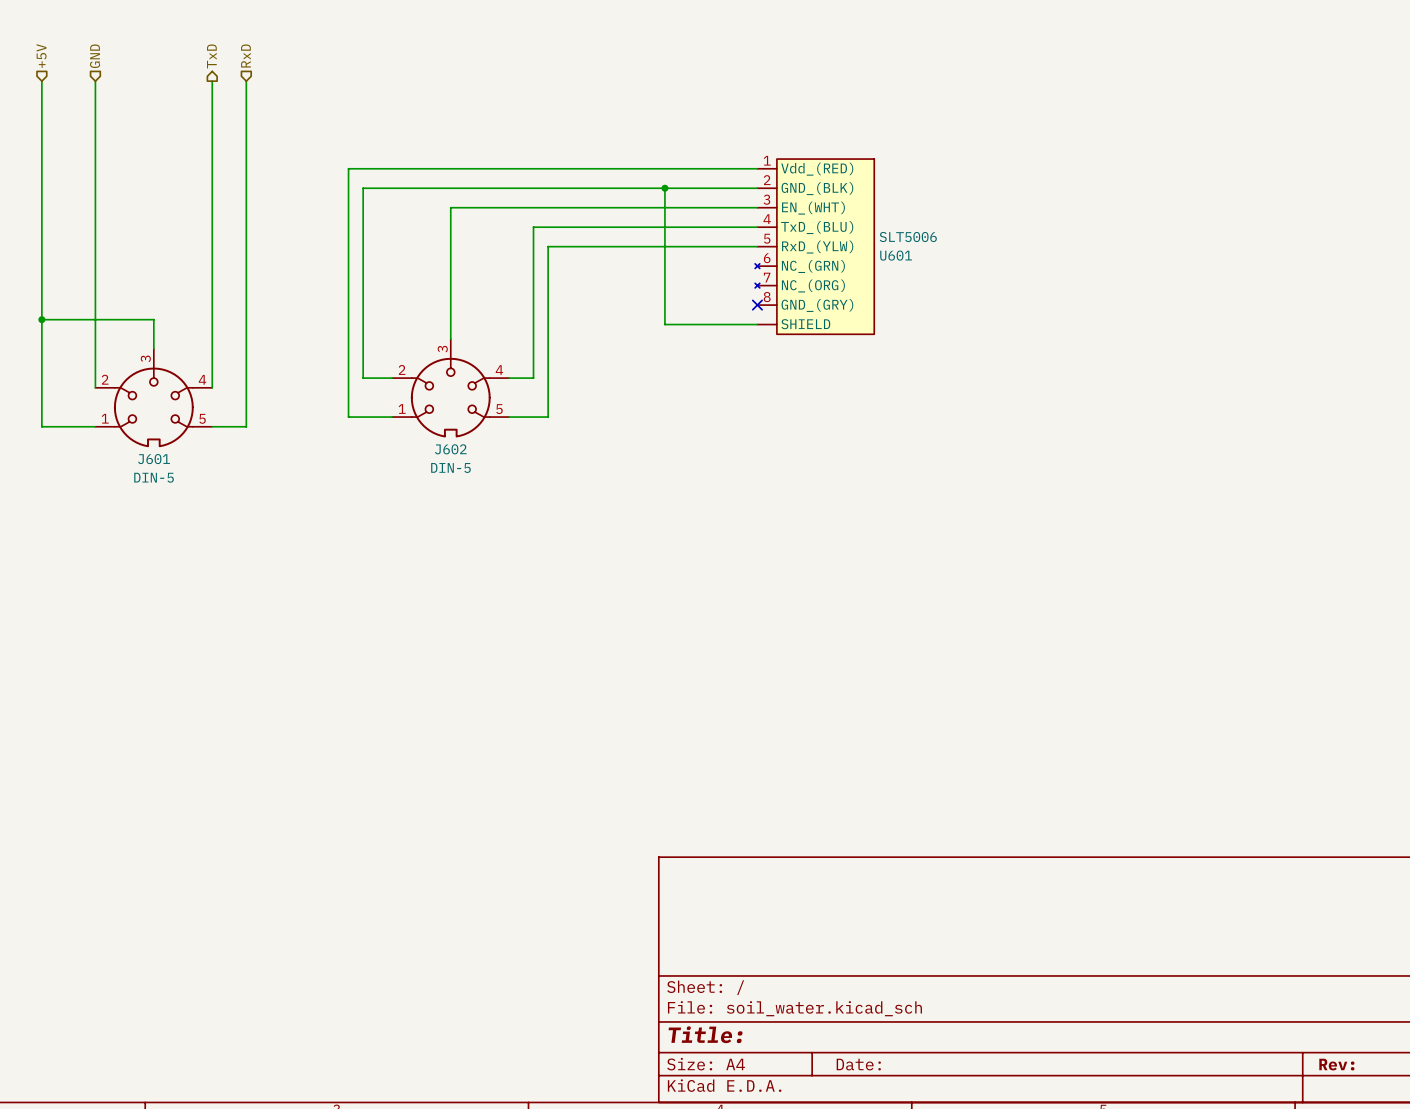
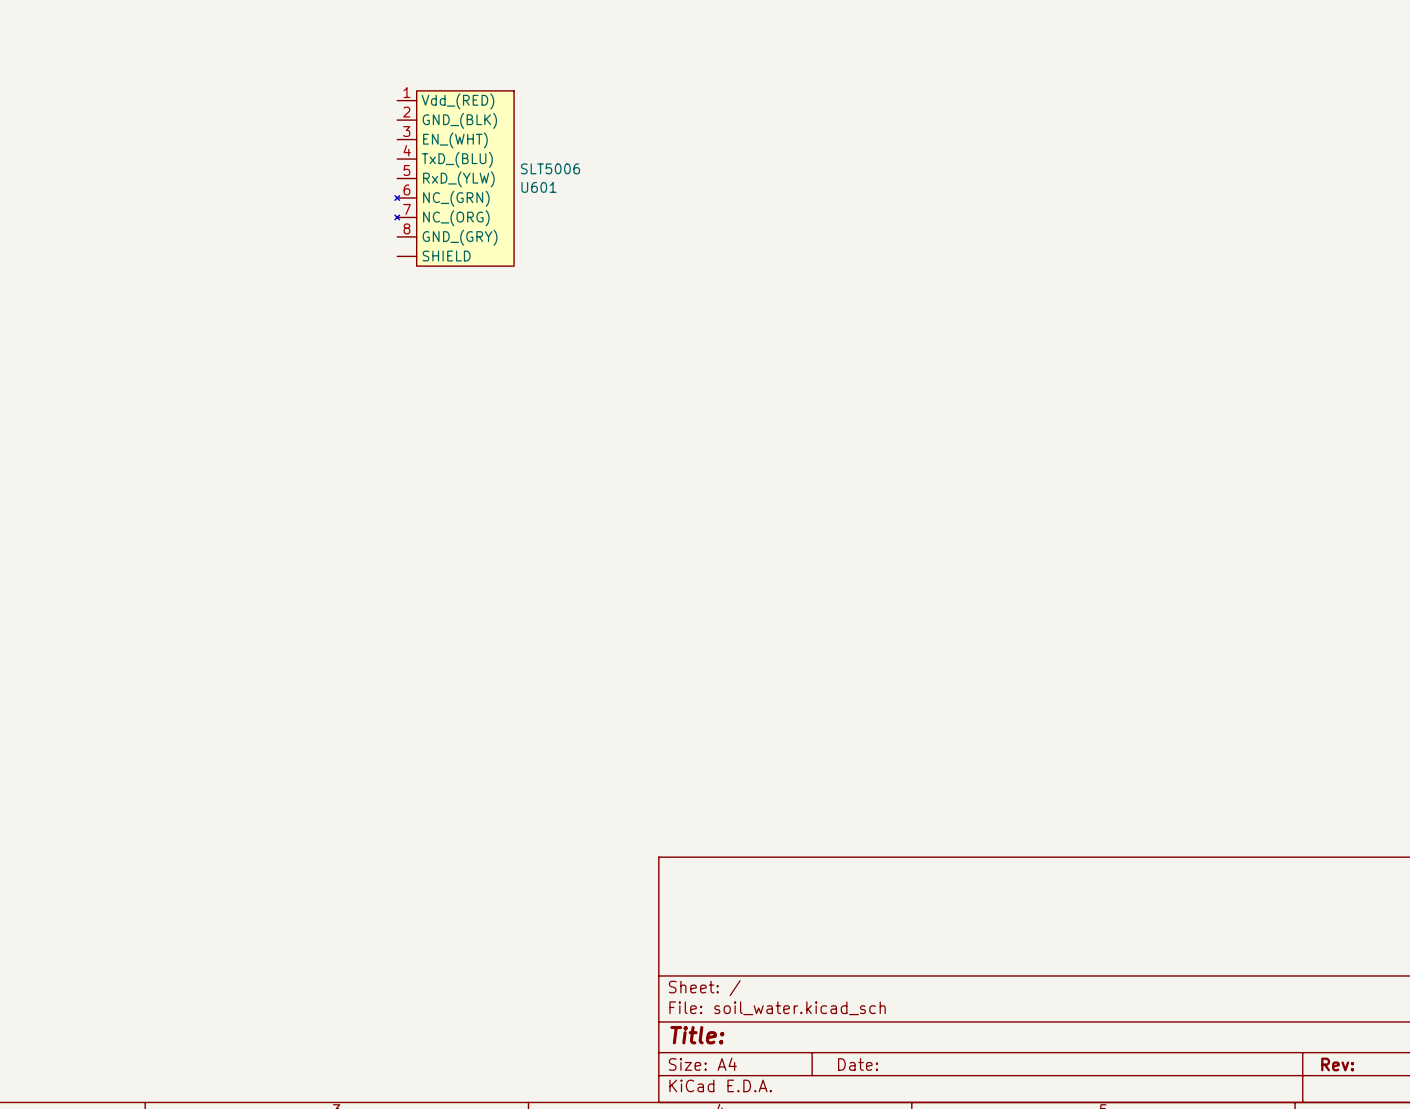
hierarchical label: +5V (41, 56) -> none
hierarchical label: GND (95, 56) -> none
hierarchical label: TxD (211, 56) -> none
hierarchical label: RxD (245, 56) -> none
wire: (41, 81) (41, 426) (95, 426) -> none
wire: (95, 81) (95, 387) -> none
wire: (212, 81) (212, 387) -> none
wire: (246, 81) (246, 426) (212, 426) -> none
wire: (757, 168) (348, 168) (348, 417) (392, 417) -> none
wire: (664, 188) (664, 324) (757, 324) -> none
junction: (664, 188) -> none
wire: (757, 188) (363, 188) (363, 378) (392, 378) -> none
wire: (757, 207) (450, 207) (450, 339) -> none
wire: (757, 227) (533, 227) (533, 378) (509, 378) -> none
wire: (757, 246) (548, 246) (548, 417) (509, 417) -> none
U601 position: (814, 246) -> (454, 178)
no-connect mark: (757, 305) -> none
wire: (41, 319) (153, 319) (153, 348) -> none
junction: (41, 319) -> none
J602: DIN-5 (450, 388) -> none
J601: DIN-5 (153, 398) -> none

